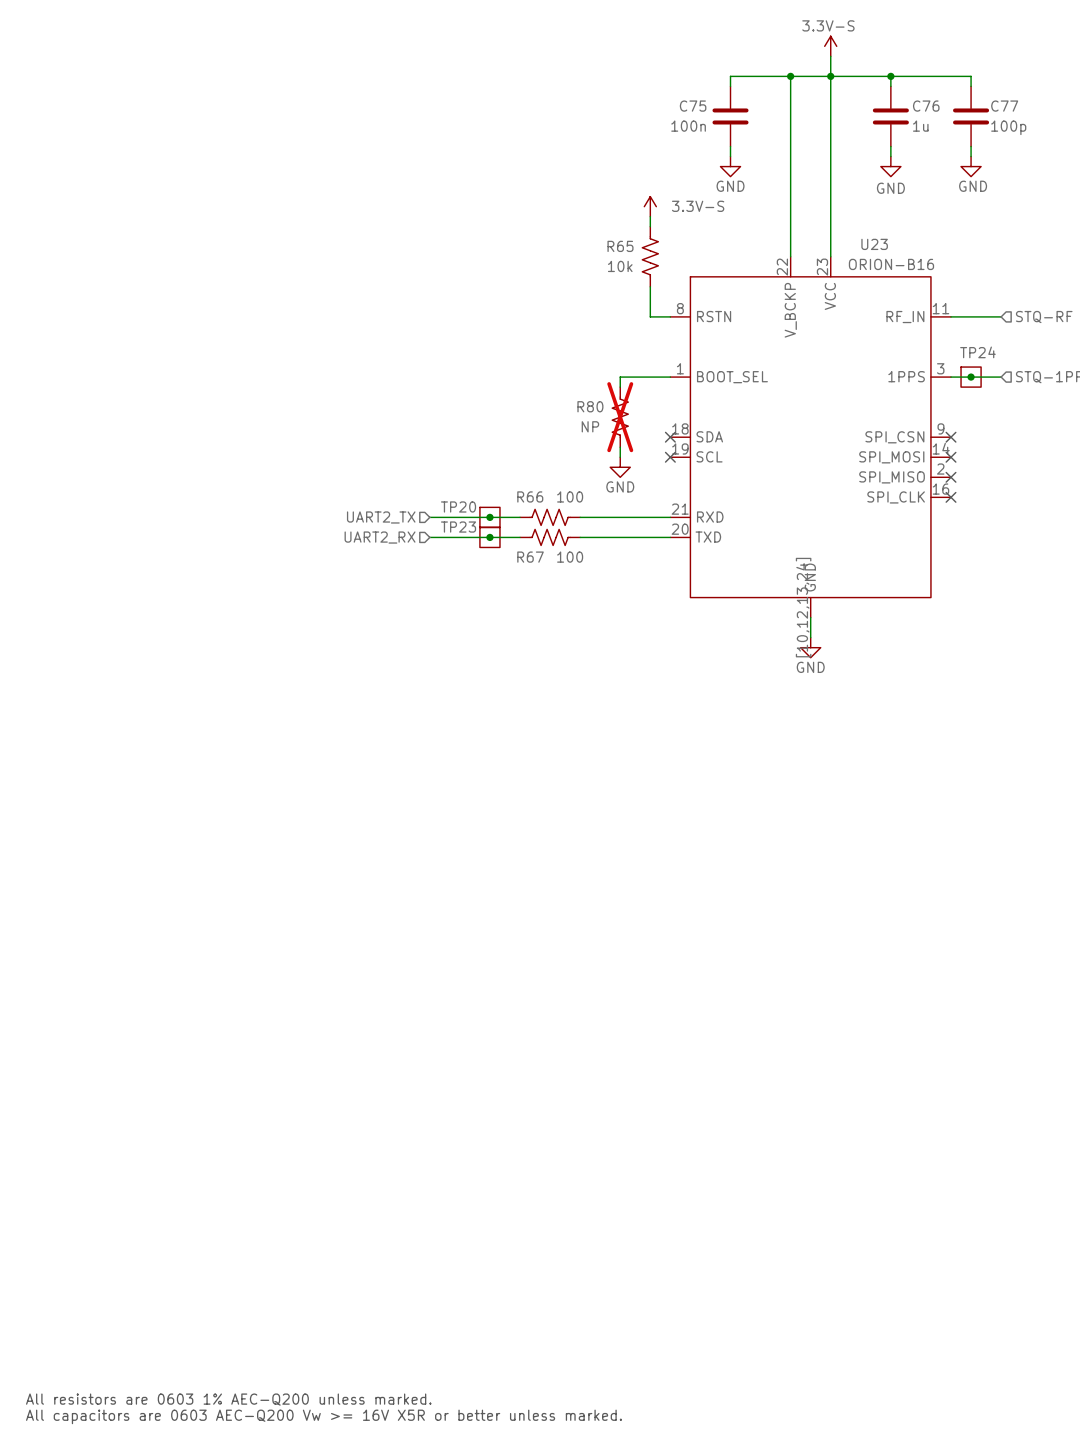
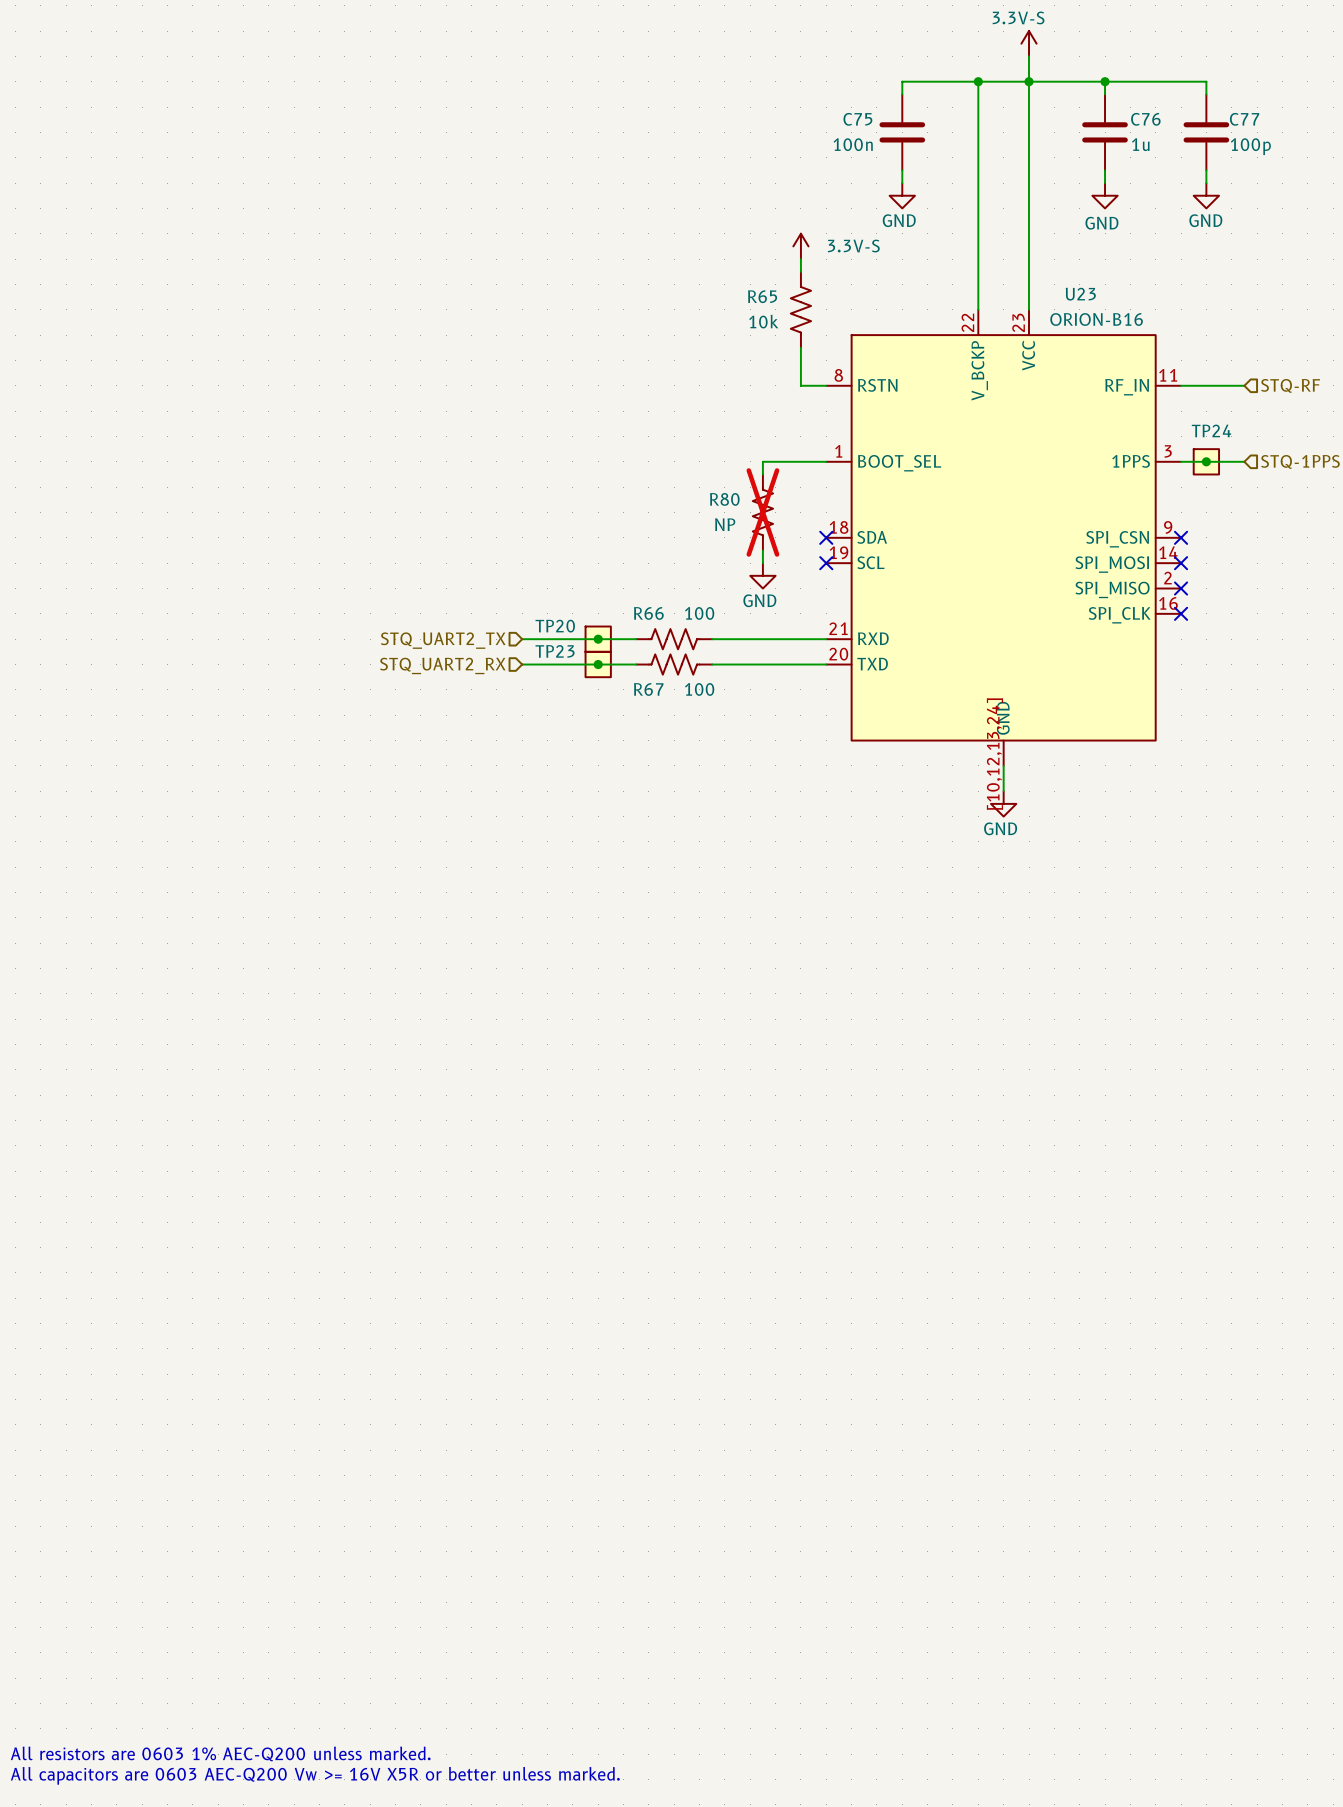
hierarchical label: UART2_TX (381, 517) -> STQ_UART2_TX (443, 640)
hierarchical label: UART2_RX (380, 537) -> STQ_UART2_RX (442, 665)

